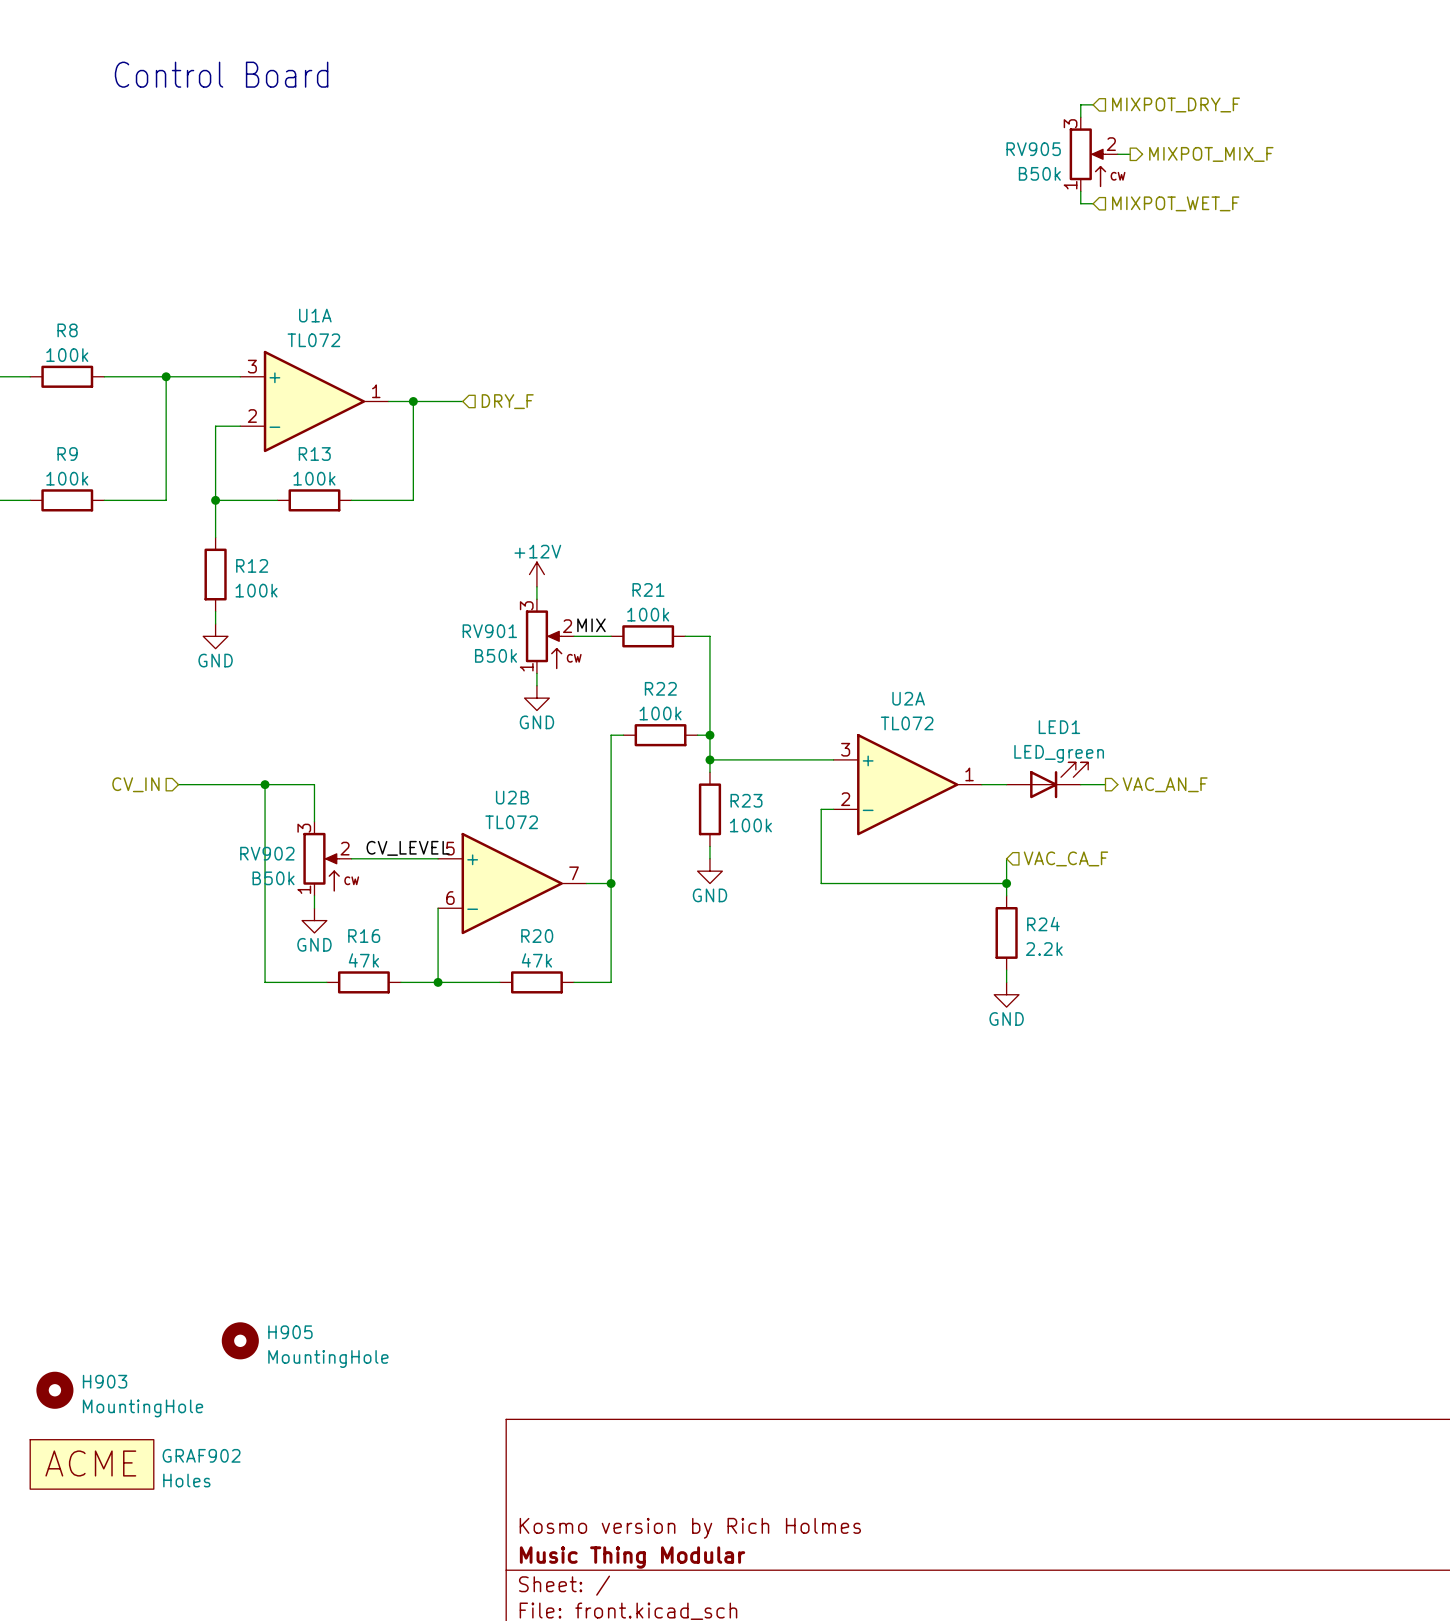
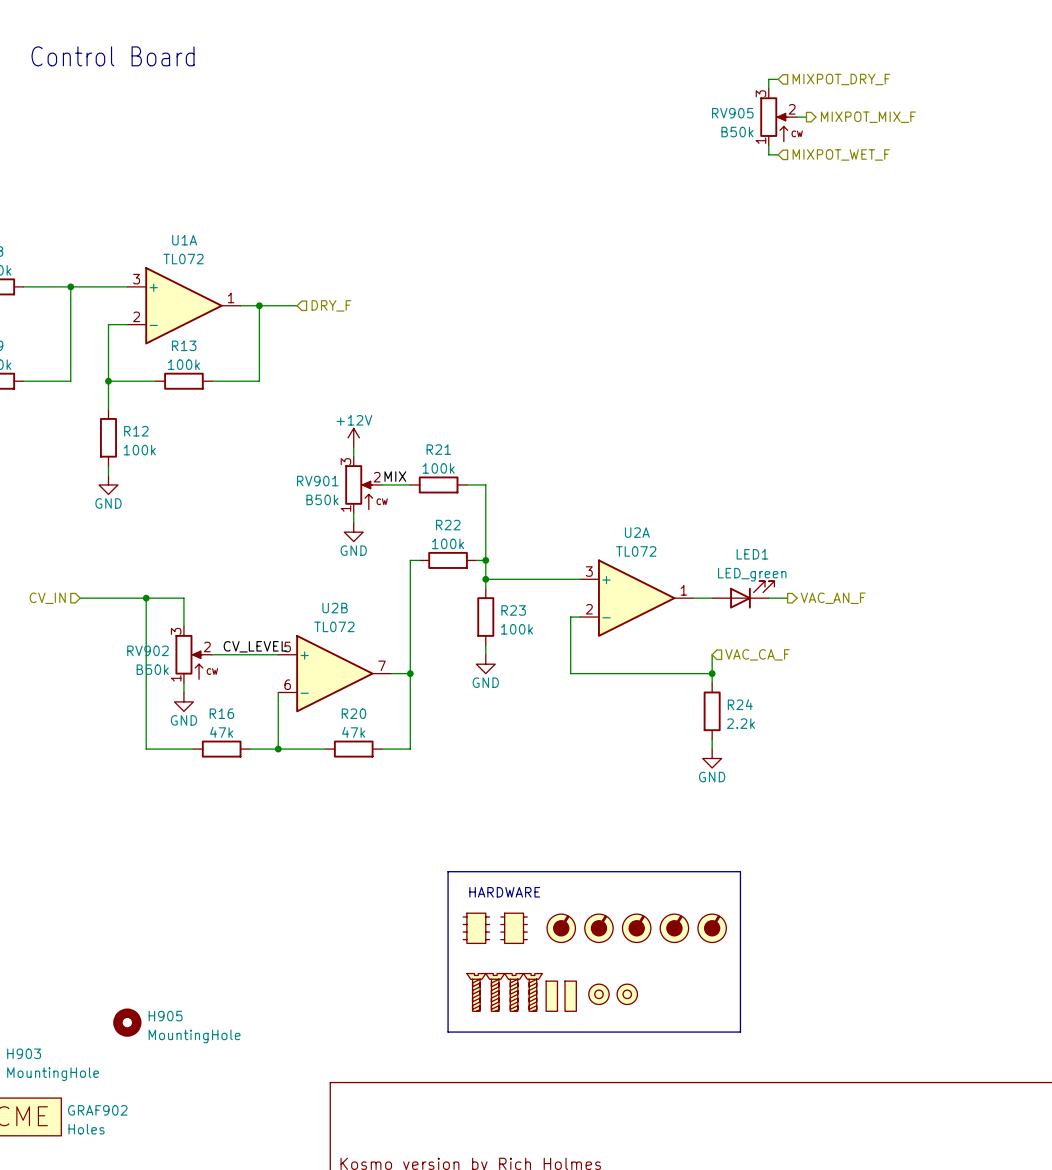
line: none -> (448, 871) (740, 871) (740, 1032) (448, 1032) (448, 871)
text: none -> HARDWARE (504, 892)
part: none -> (476, 928)
part: none -> (514, 928)
part: none -> (561, 928)
part: none -> (598, 928)
part: none -> (636, 928)
part: none -> (674, 928)
part: none -> (712, 928)
part: none -> (476, 992)
part: none -> (495, 992)
part: none -> (514, 992)
part: none -> (532, 992)
part: none -> (598, 994)
part: none -> (627, 994)
part: none -> (551, 996)
part: none -> (570, 996)

